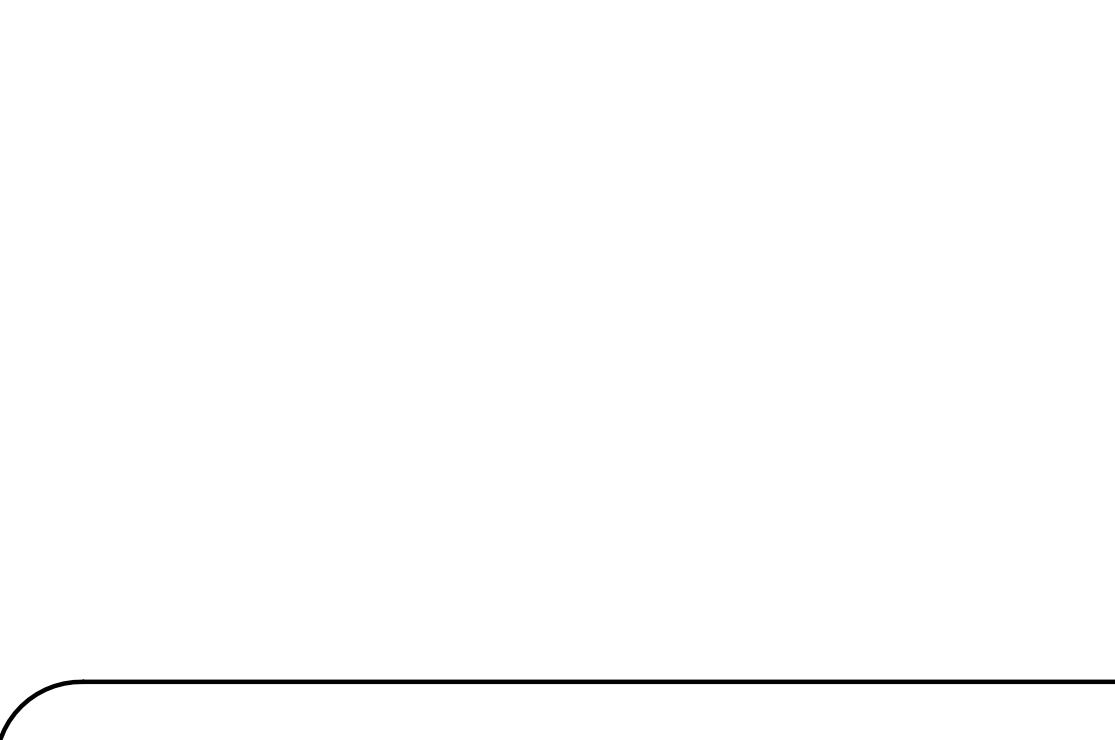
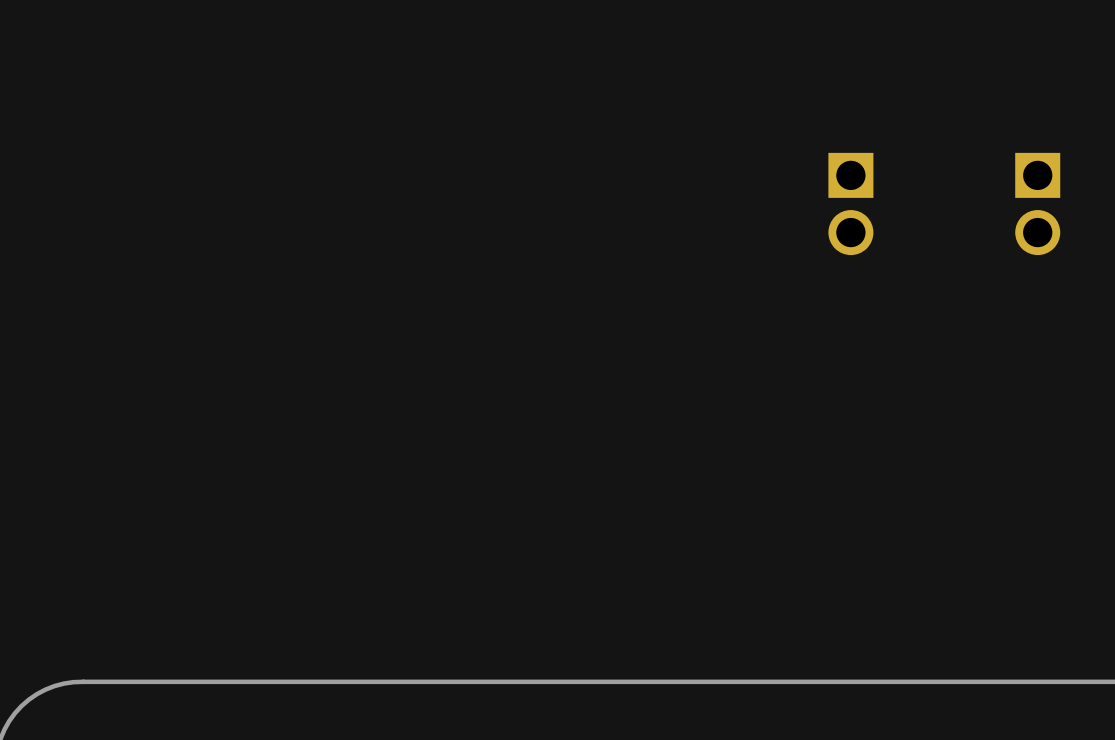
part: none -> (850, 203)
part: none -> (1037, 203)

